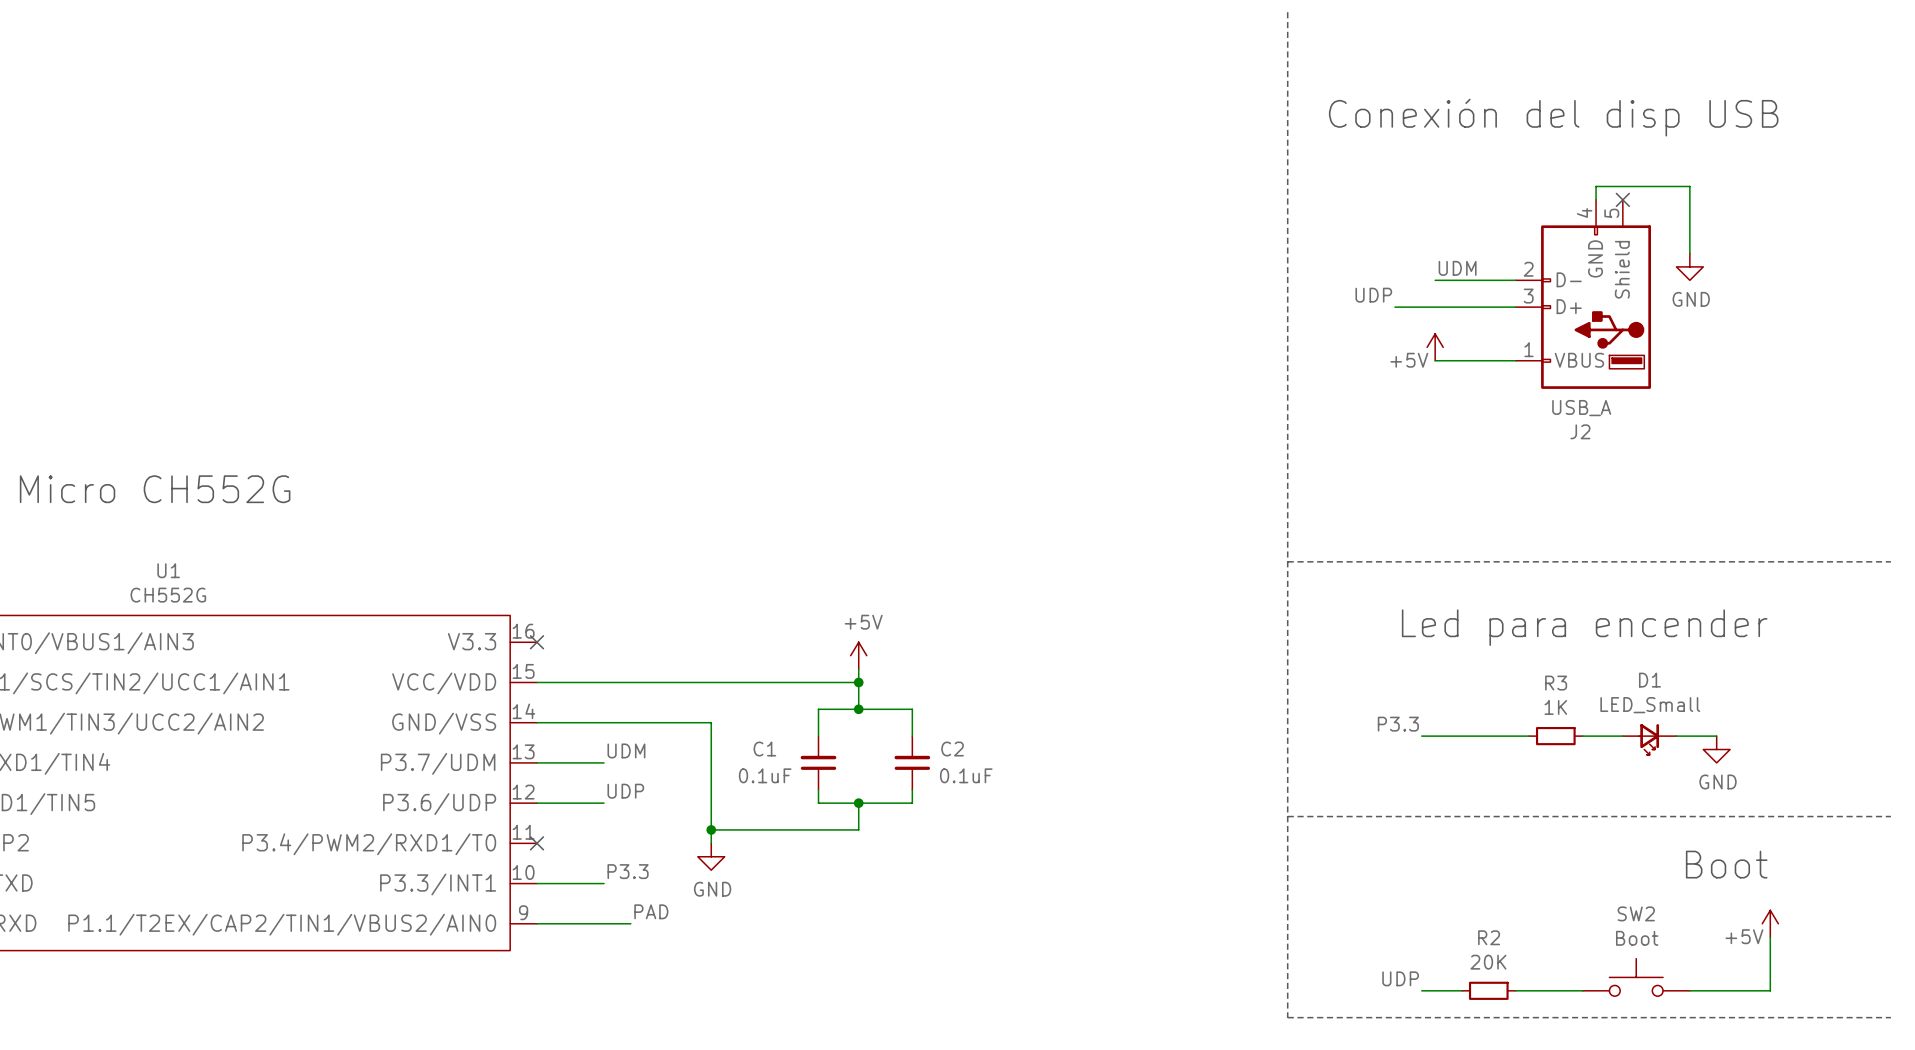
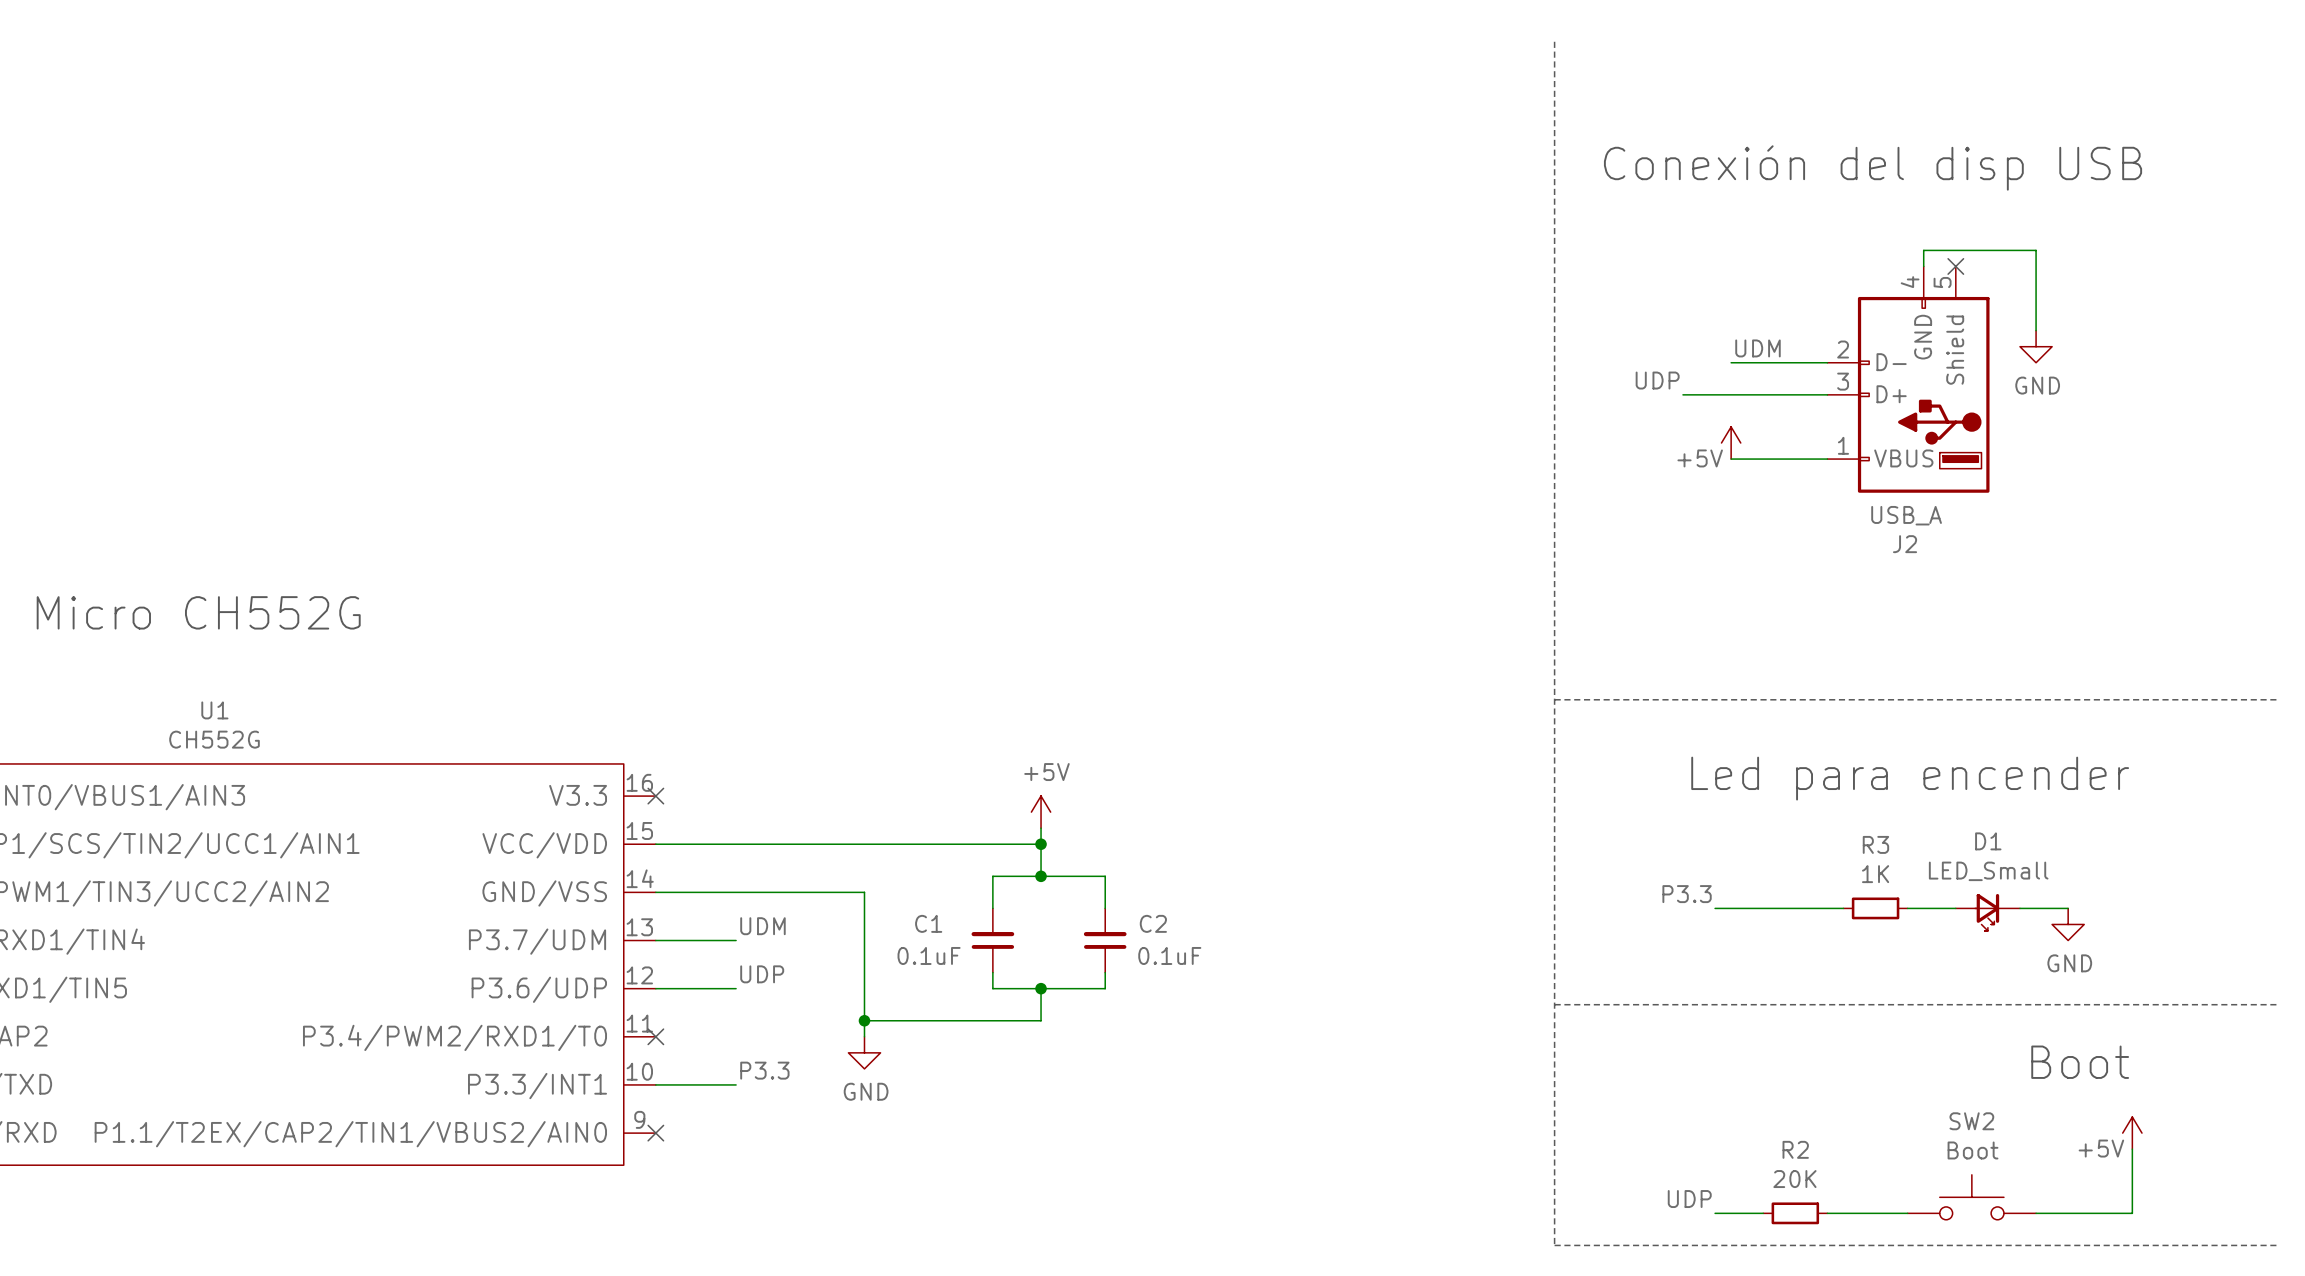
label: PAD (651, 911) -> none
wire: (536, 923) (630, 923) -> none
no-connect mark: none -> (655, 1133)

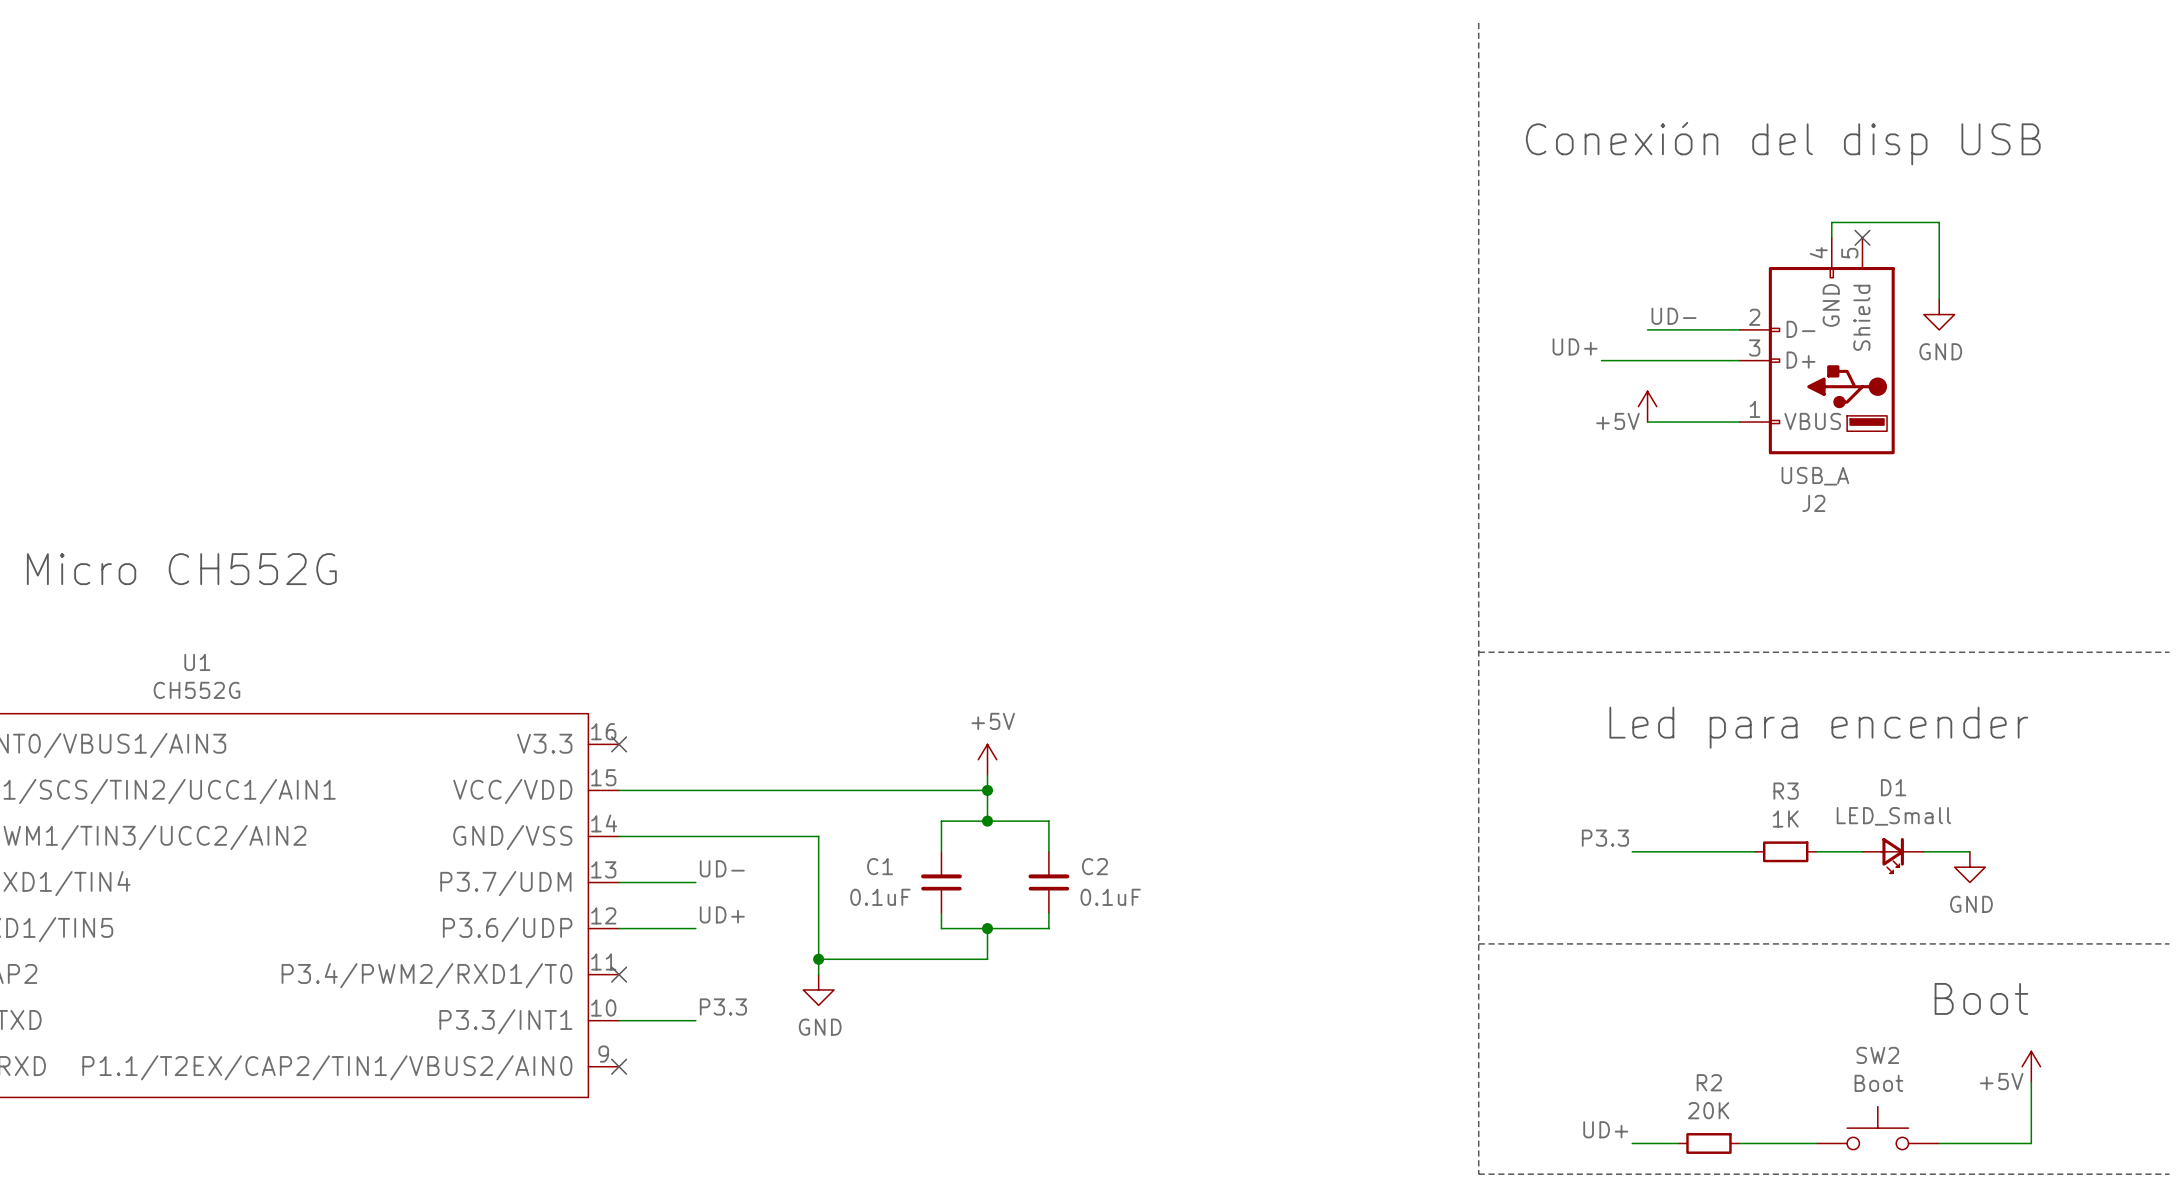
label: UDM (1757, 348) -> UD- (1673, 316)
label: UDP (1657, 380) -> UD+ (1575, 346)
label: UDM (762, 926) -> UD- (722, 868)
label: UDP (762, 974) -> UD+ (722, 914)
label: UDP (1689, 1199) -> UD+ (1605, 1129)

